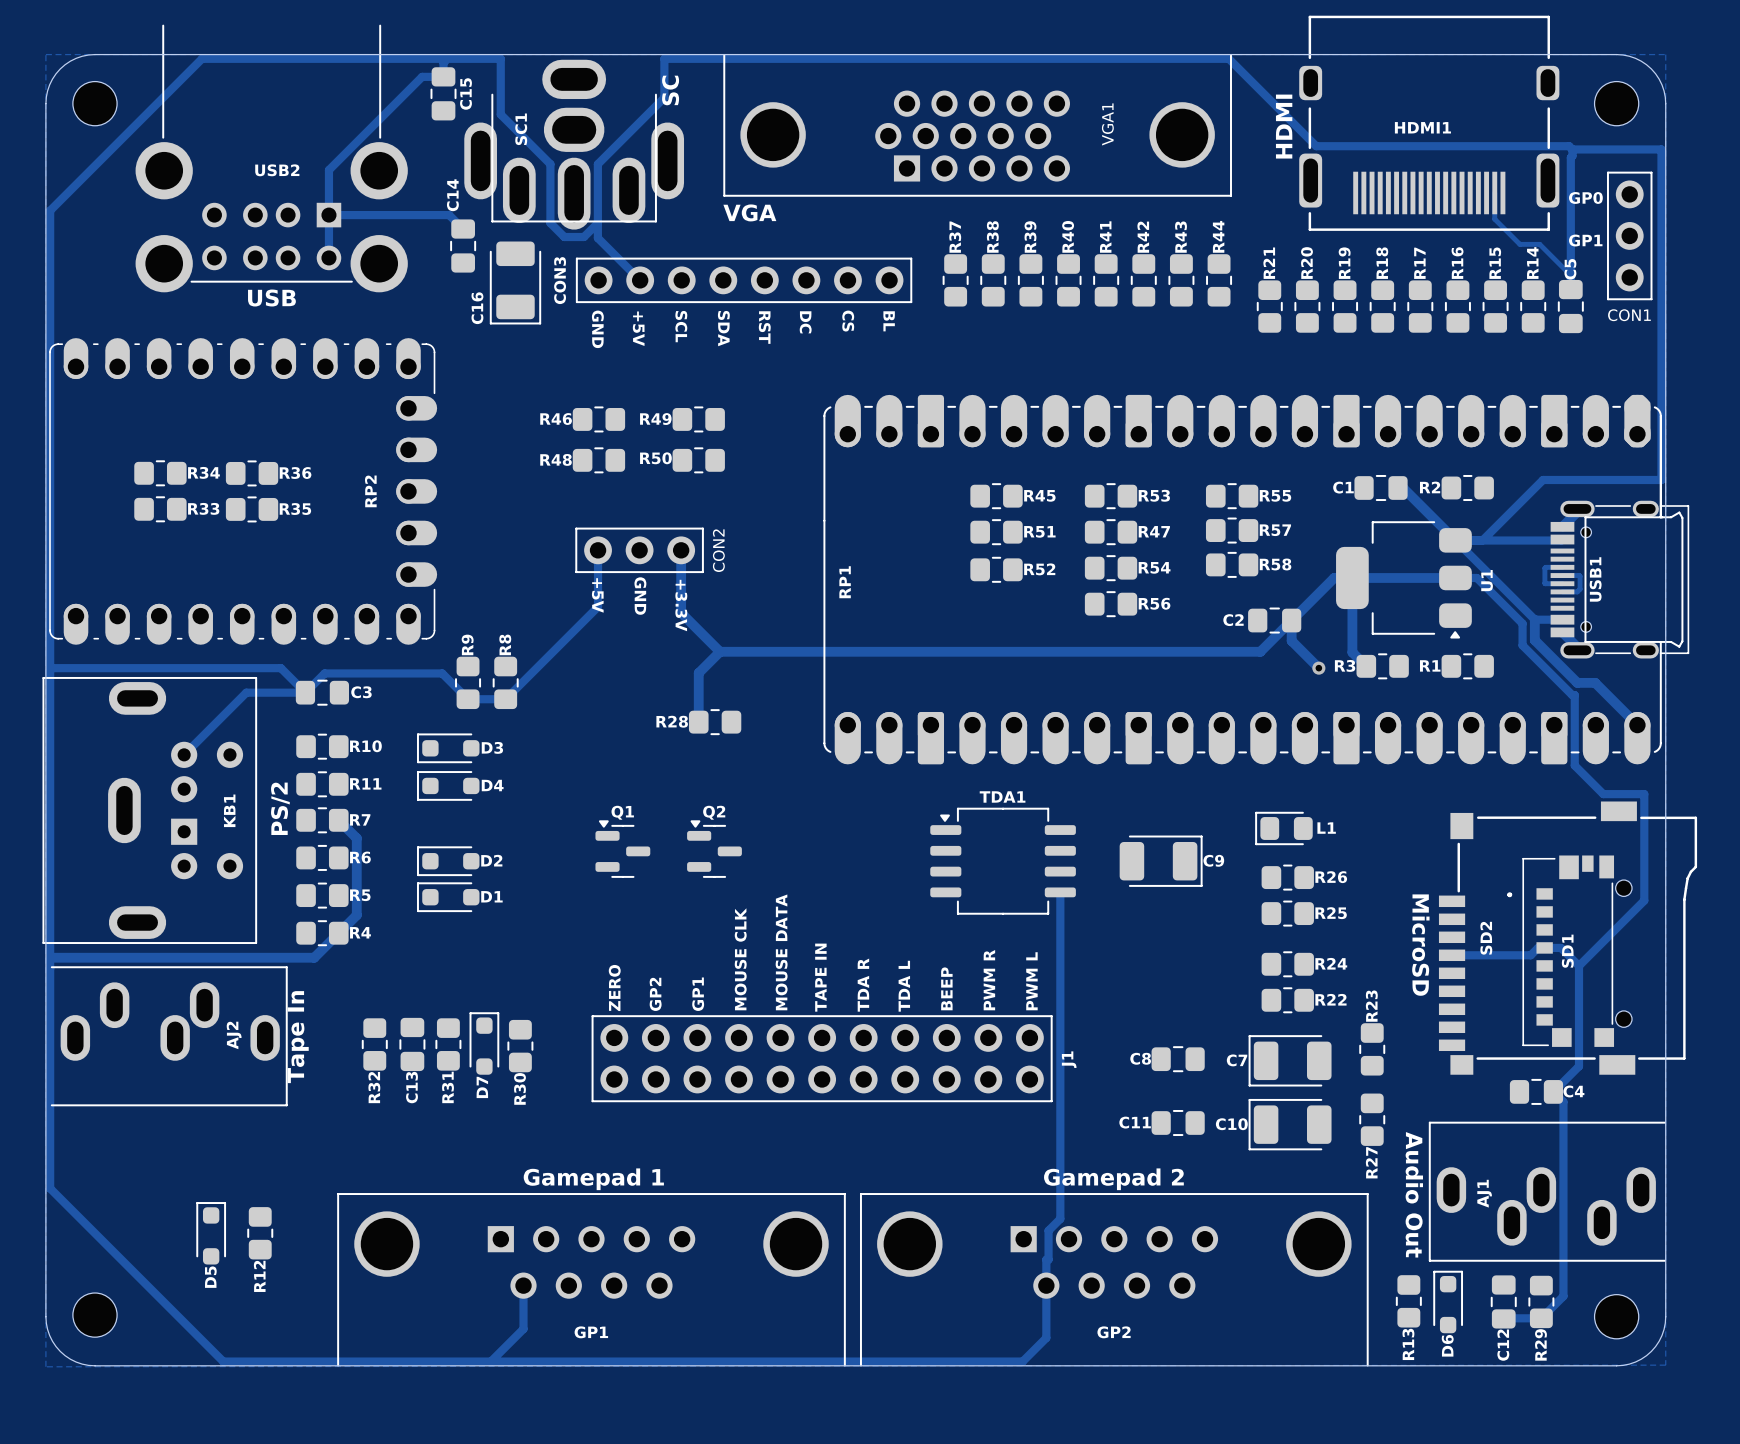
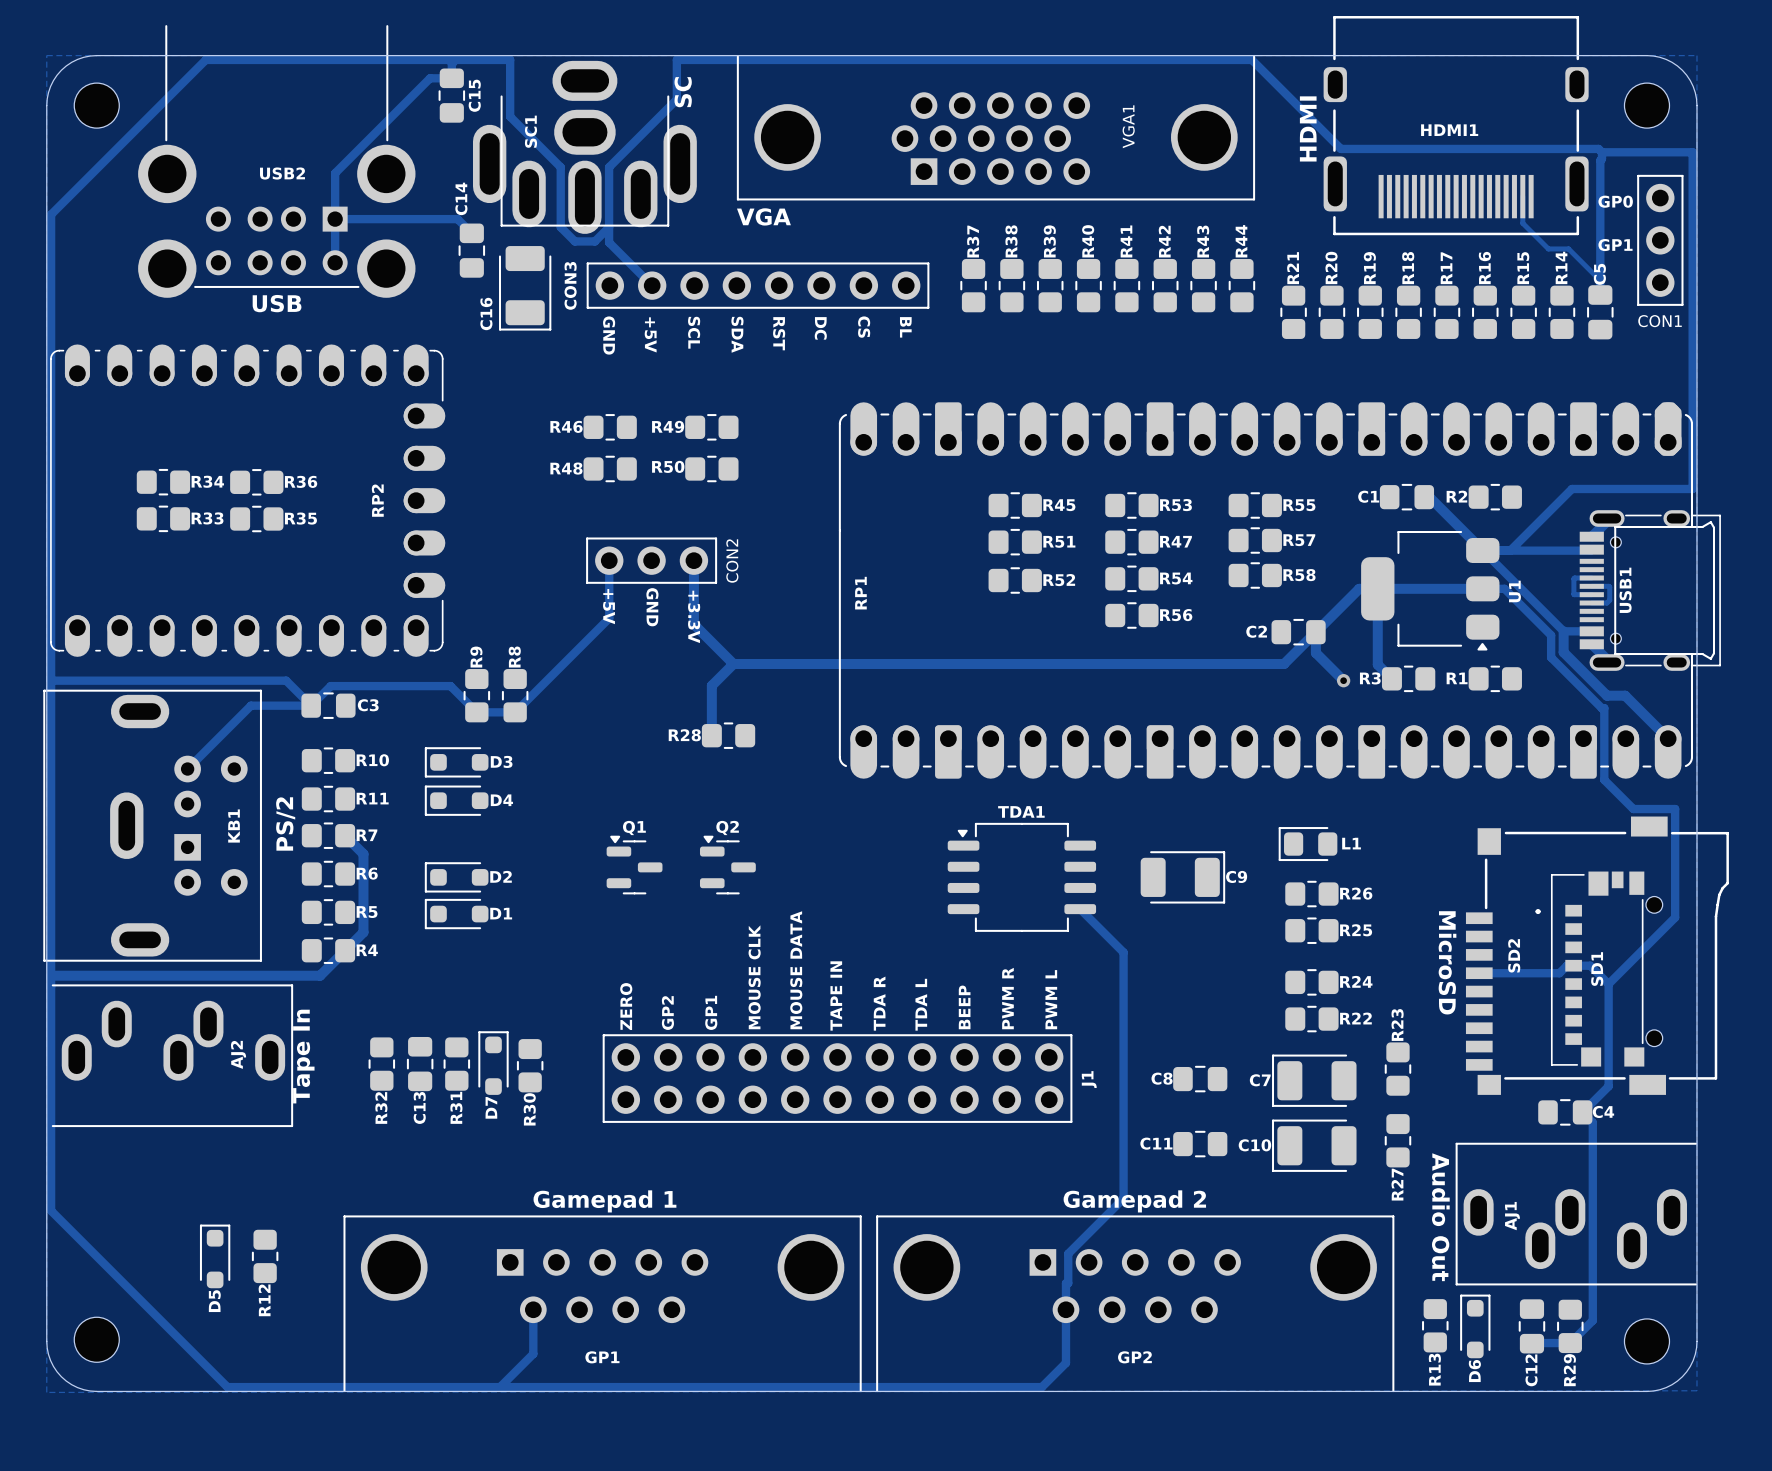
track: (1060, 892) (1060, 1218) -> (1080, 909) (1123, 952) (1123, 1198) (1080, 1241)

